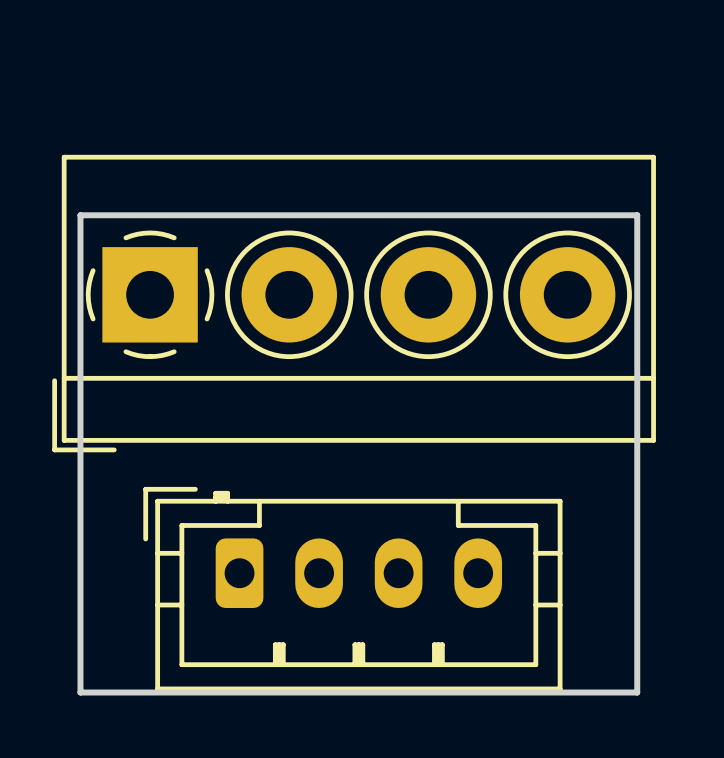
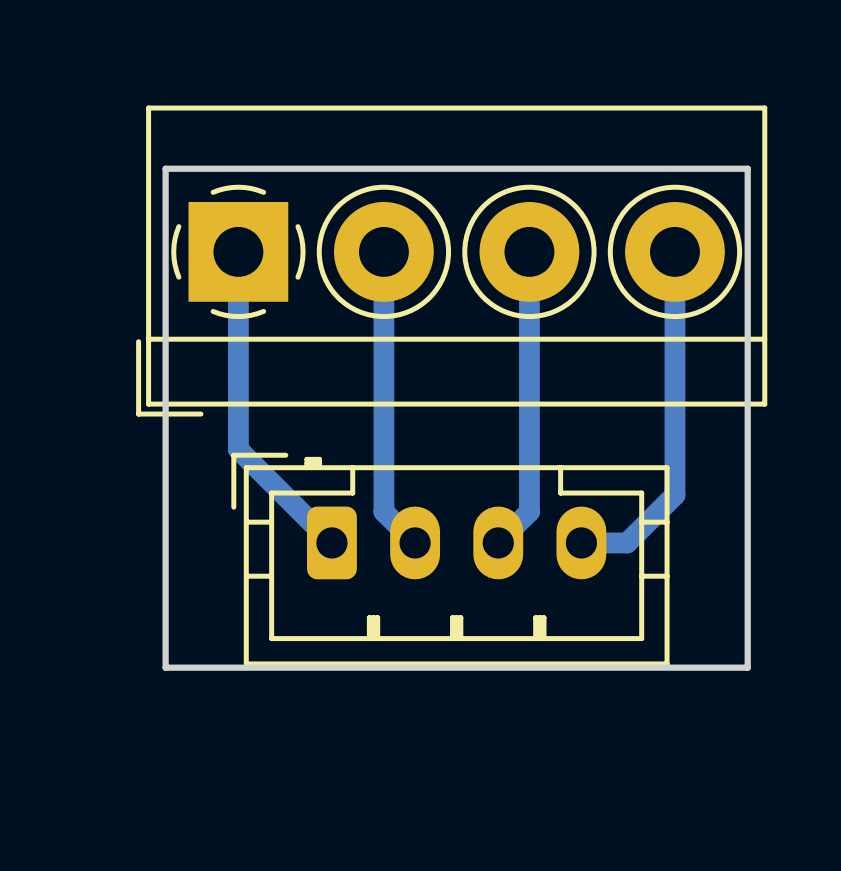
bottom track: none -> (238, 251) (238, 449) (331, 542)
bottom track: none -> (383, 251) (383, 511) (415, 542)
bottom track: none -> (529, 251) (529, 511) (498, 542)
bottom track: none -> (674, 251) (674, 495) (627, 542) (581, 542)

